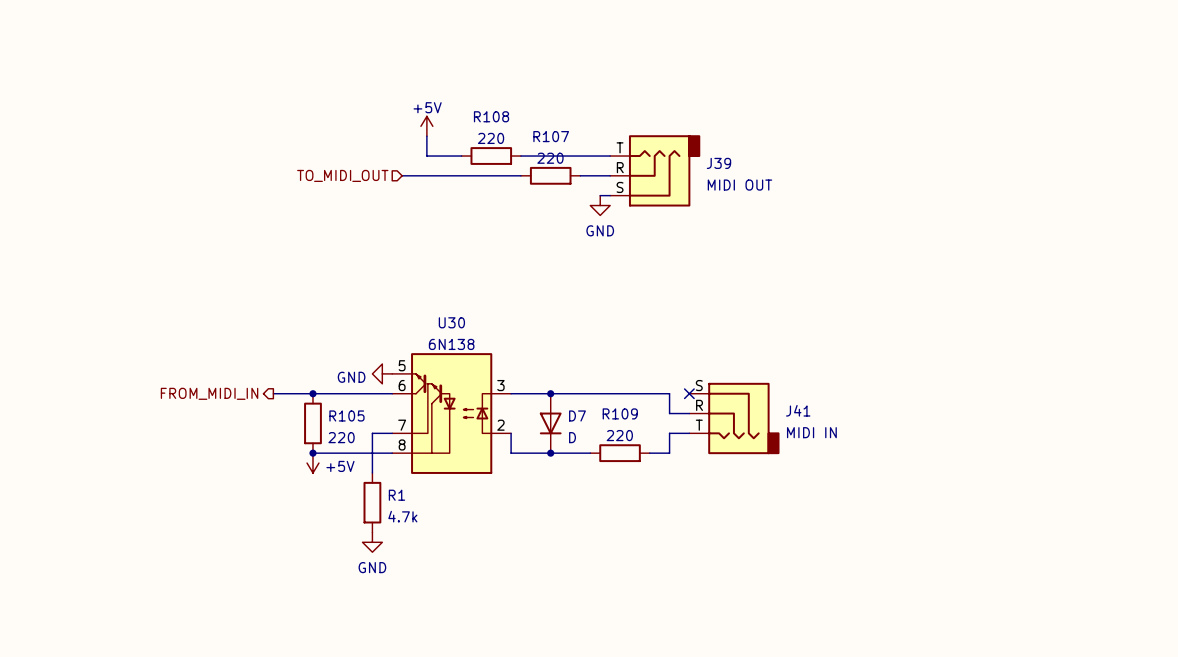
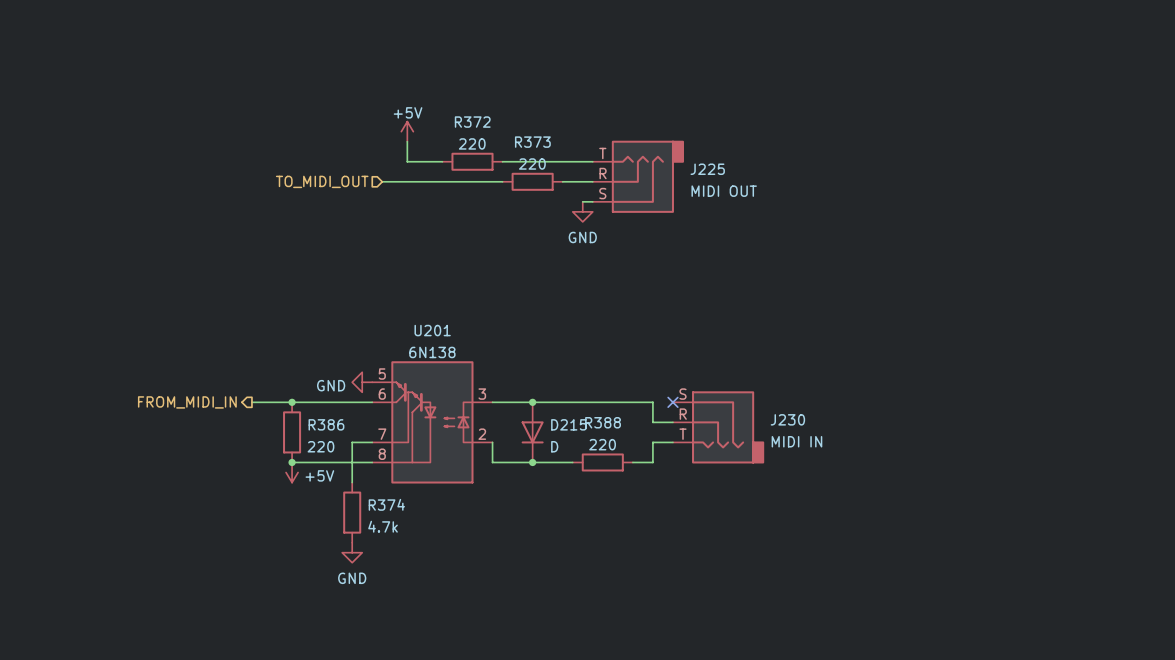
R108 name: R108 (491, 116) -> R372 (472, 122)
R107 name: R107 (551, 136) -> R373 (532, 142)
J39 name: J39 (718, 163) -> J225 (707, 169)
U30 name: U30 (451, 322) -> U201 (432, 330)
J41 name: J41 (798, 410) -> J230 (787, 419)
R109 name: R109 (620, 413) -> R388 (603, 422)
R105 name: R105 (346, 415) -> R386 (326, 424)
D7 name: D7 (577, 415) -> D215 (569, 424)
R1 name: R1 (396, 495) -> R374 (386, 504)

